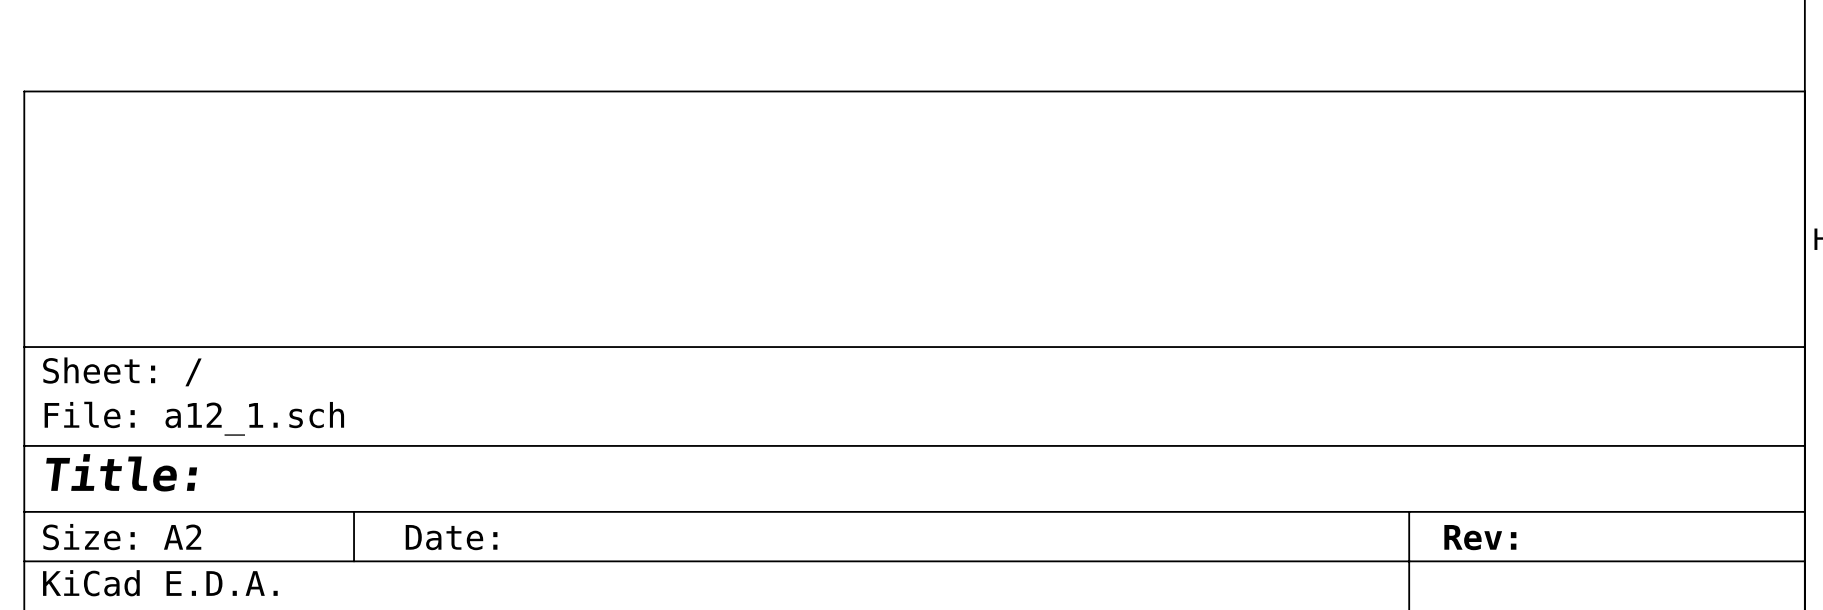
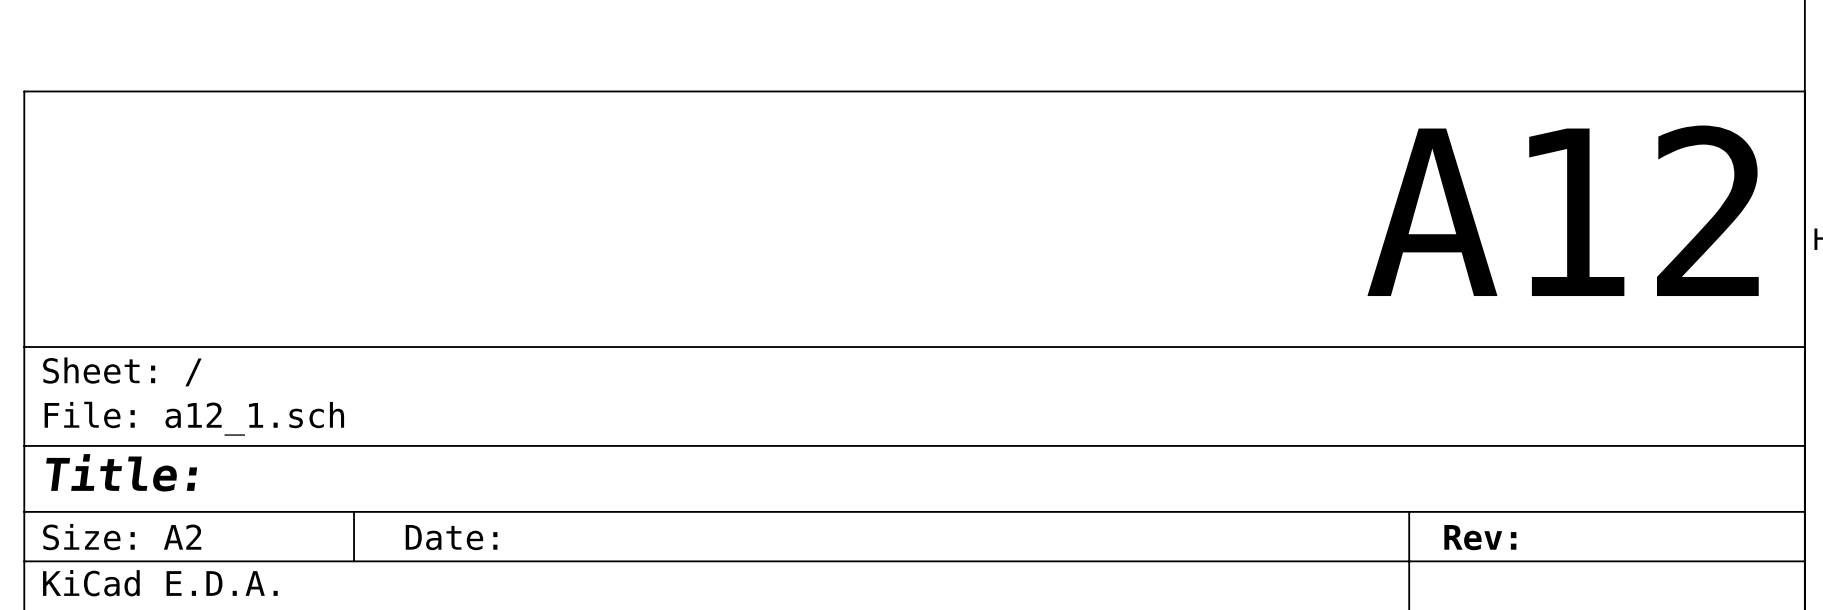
text: none -> A12 (1563, 210)

